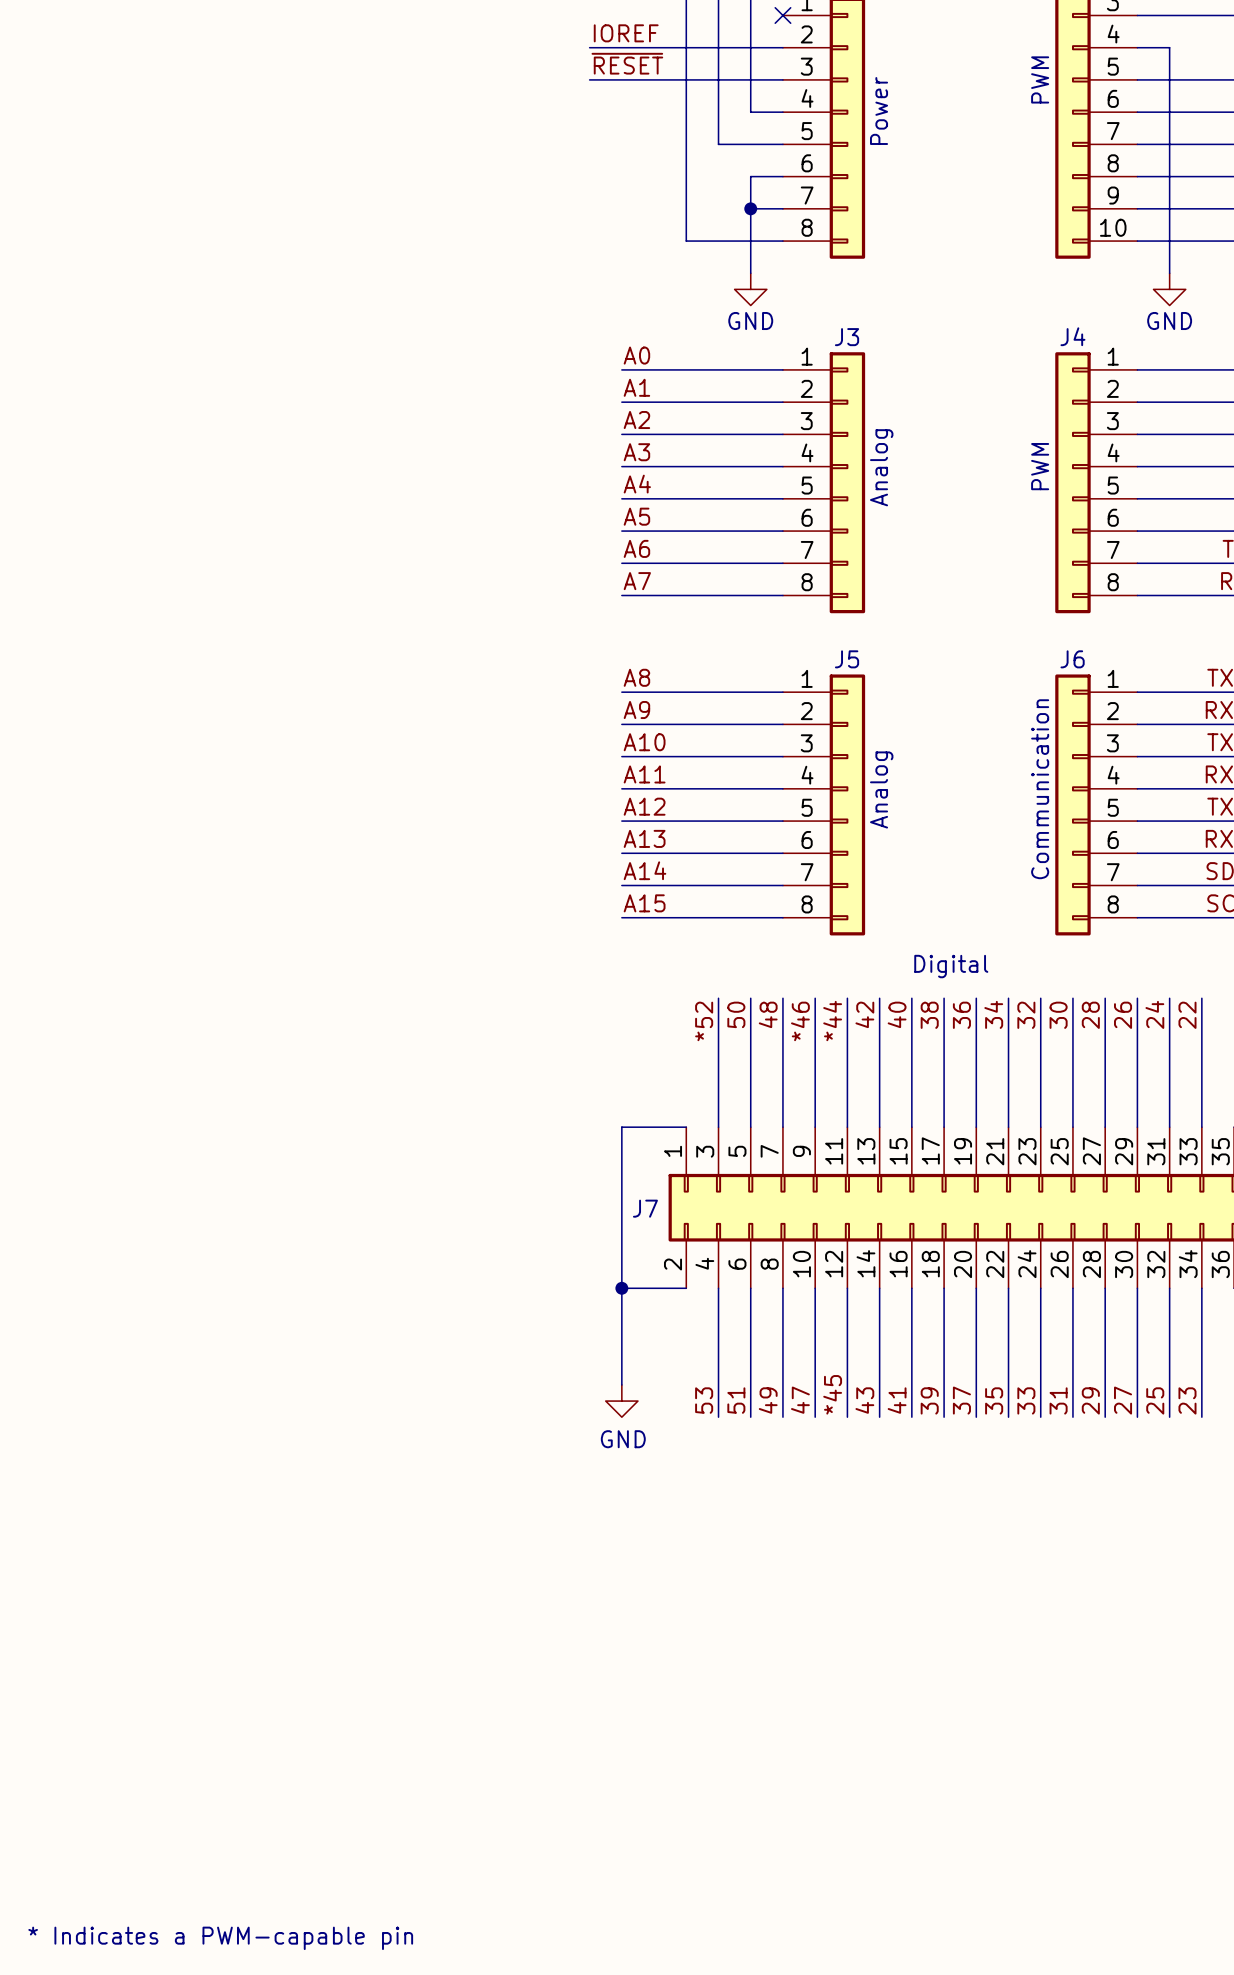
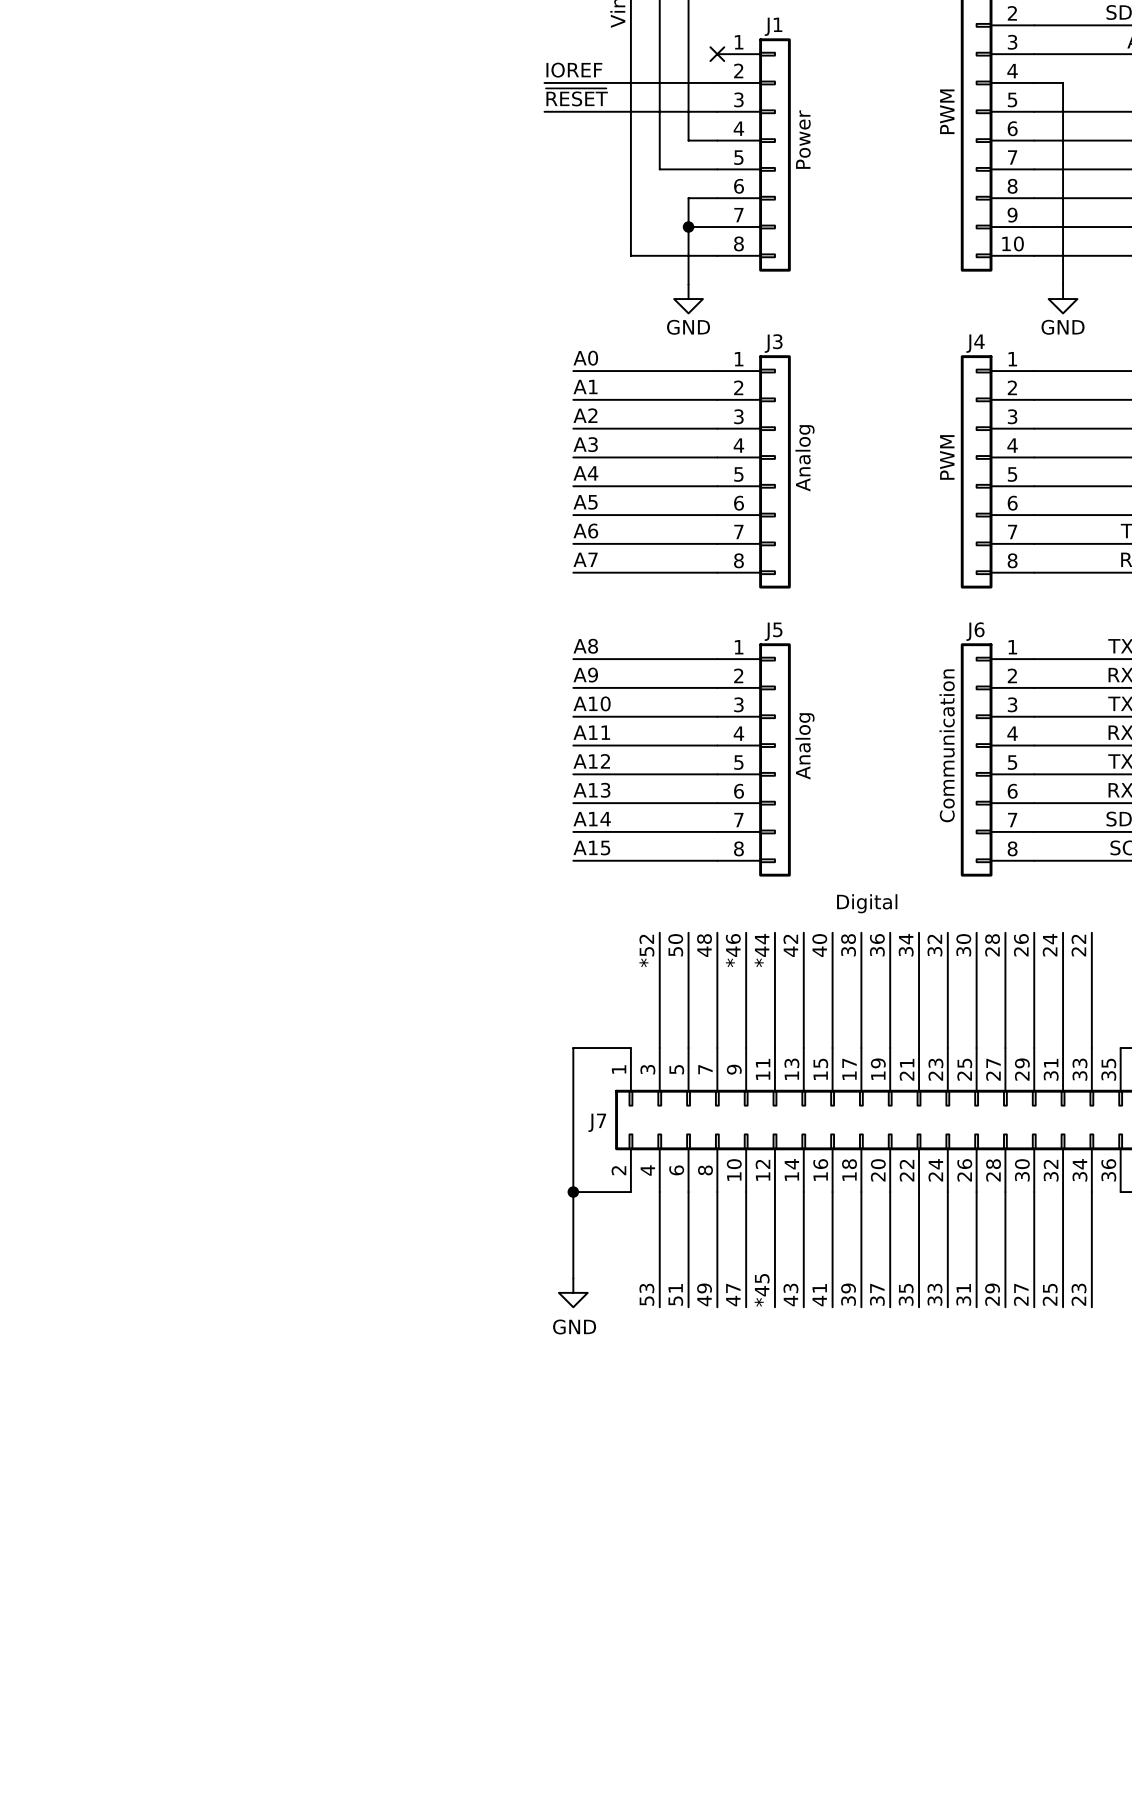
text: * Indicates a PWM-capable pin (220, 1938) -> none

